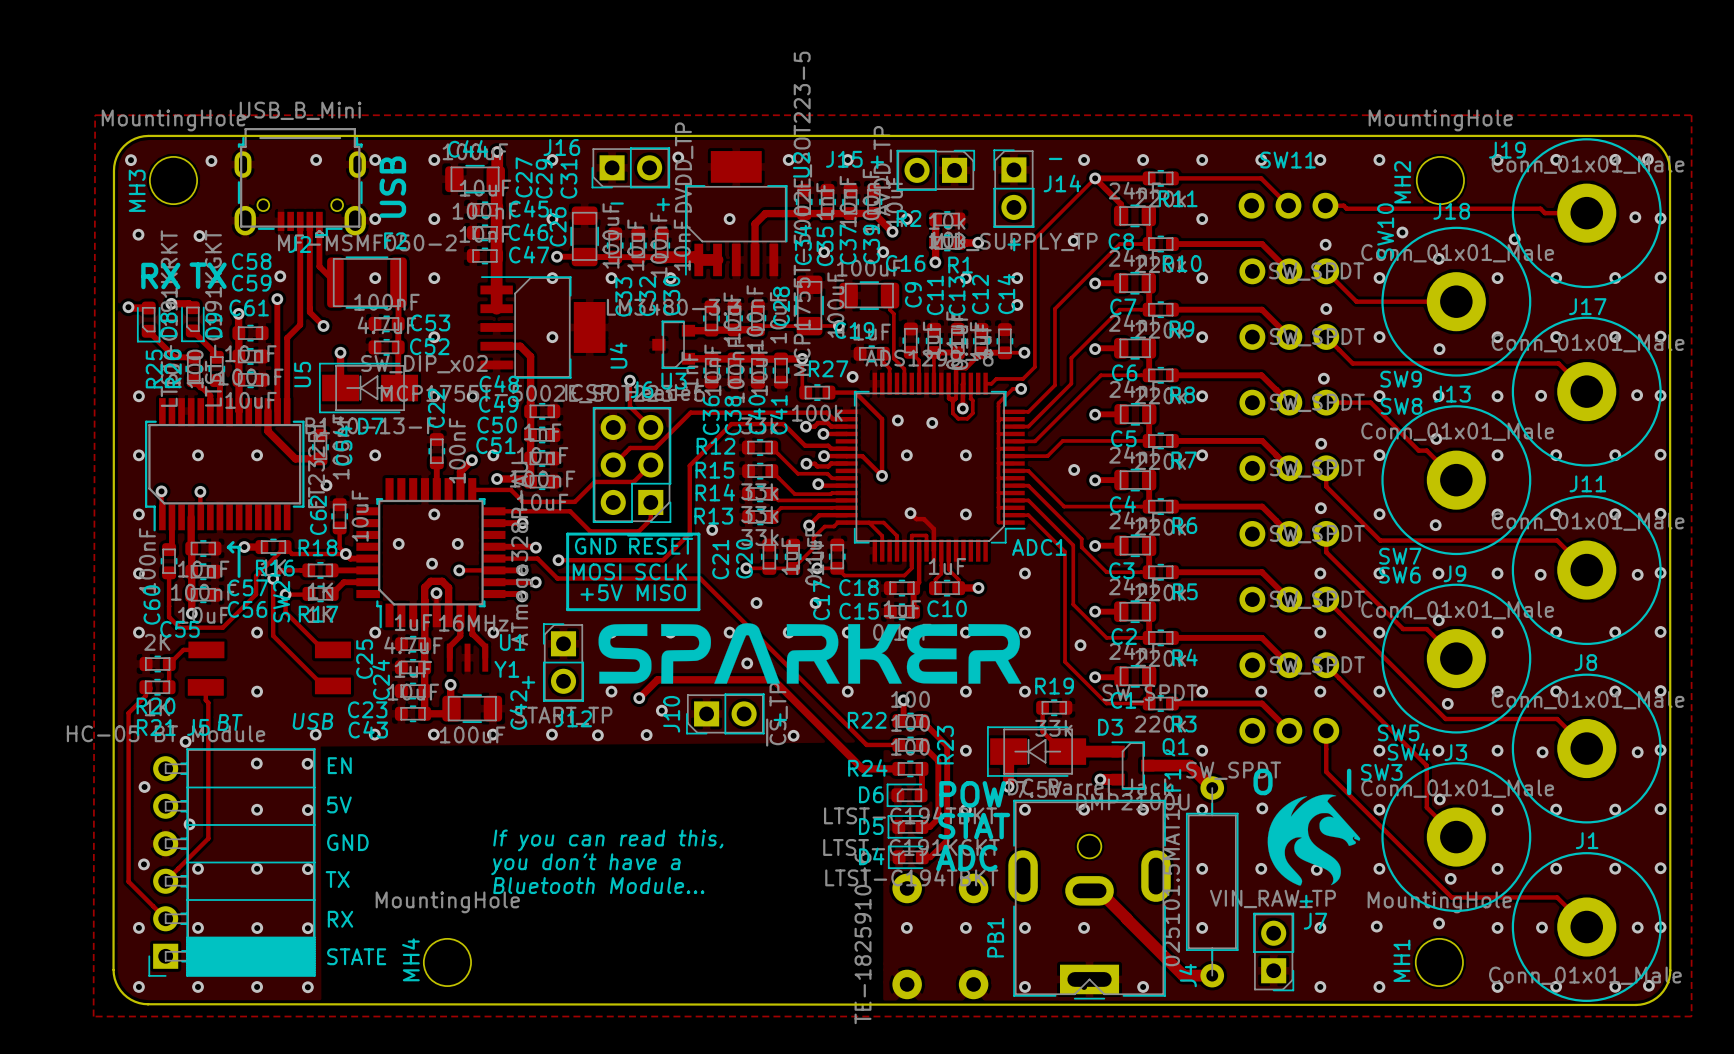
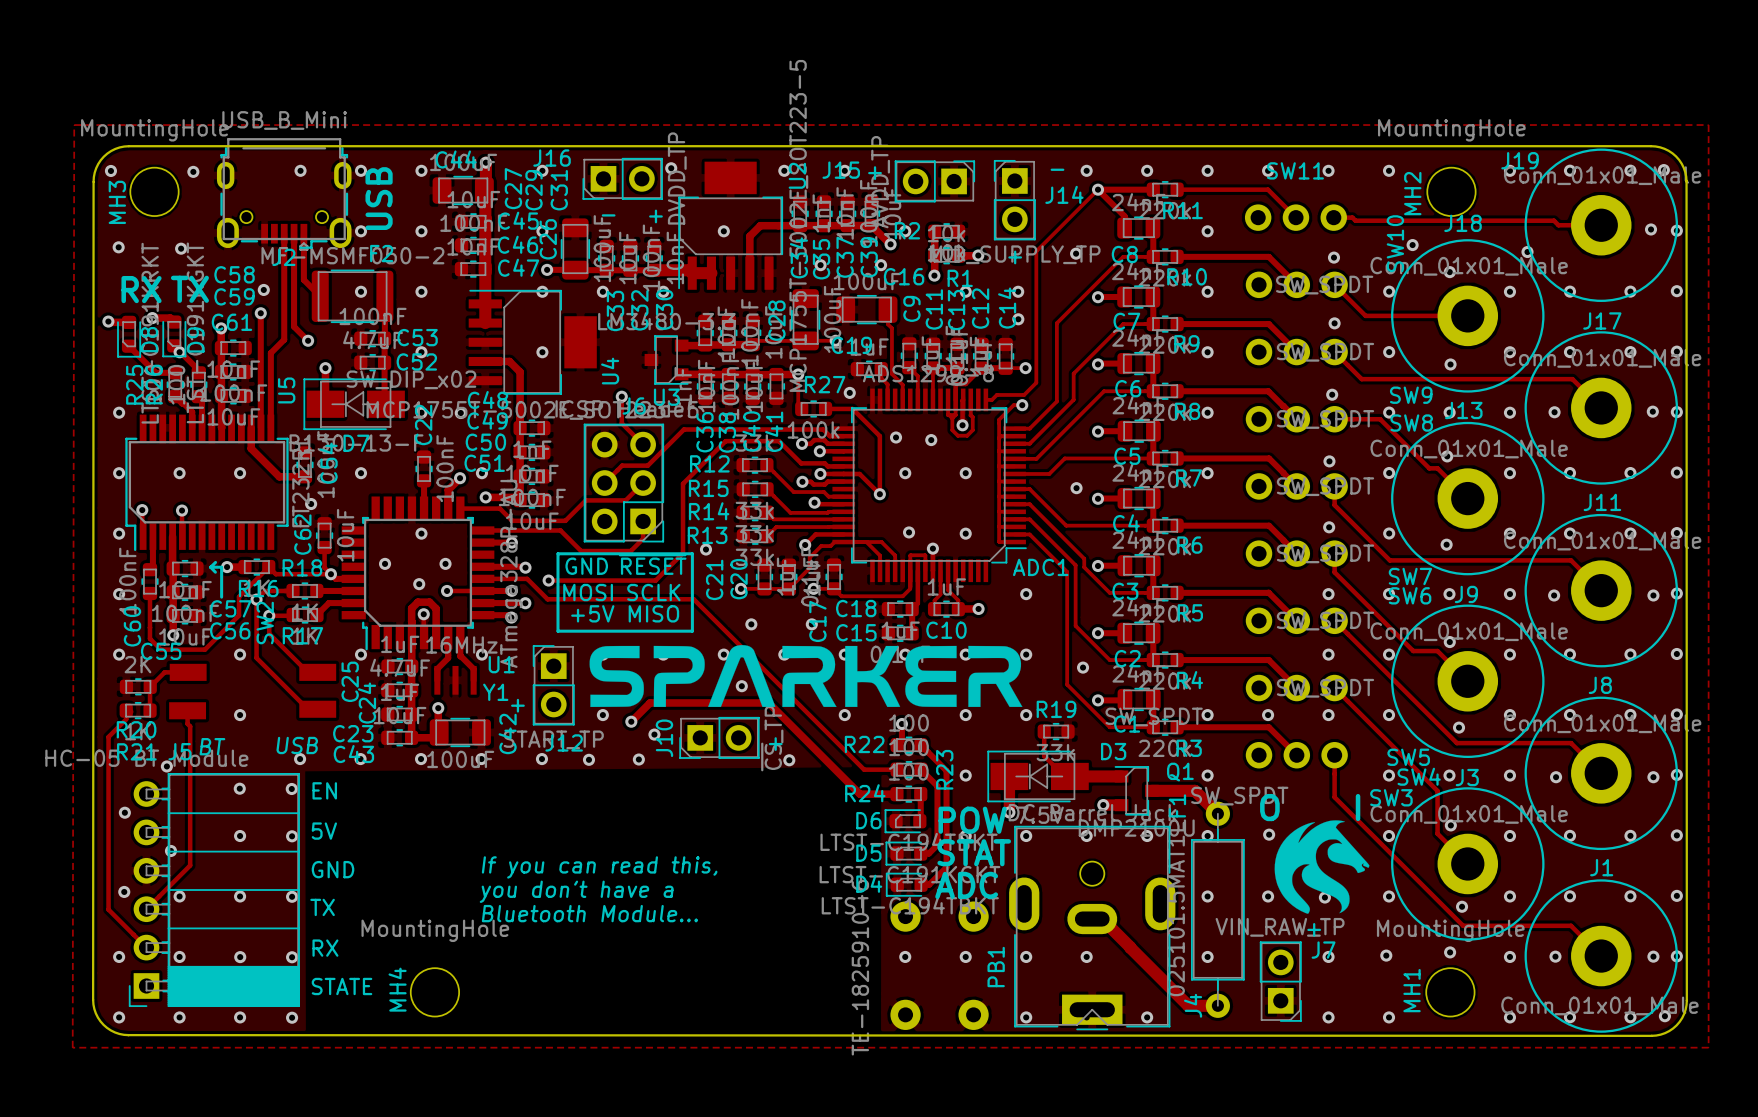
via: none -> (179, 352)
track: (910, 513) (916, 519) (923, 519) (933, 529) -> none
via: none -> (932, 548)

